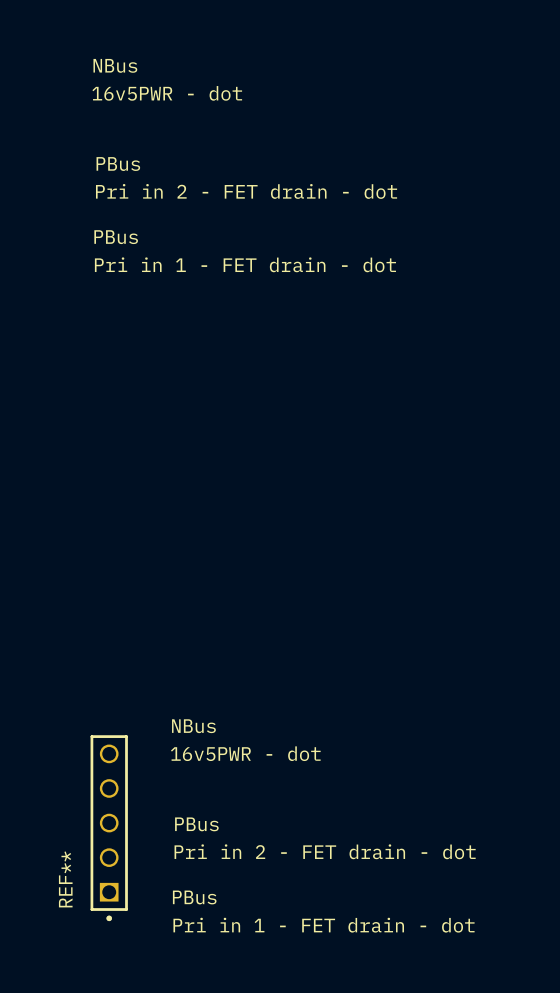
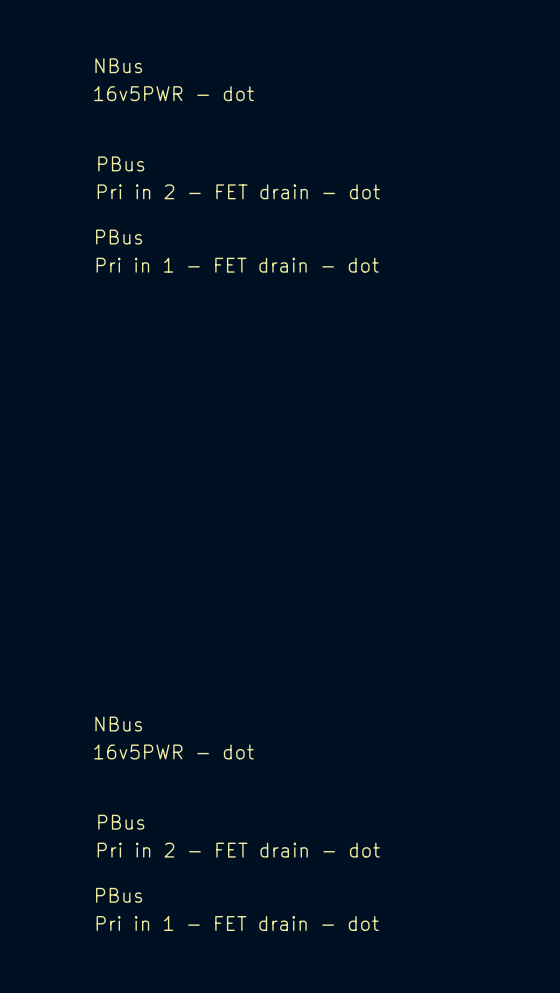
text position: NBus (193, 726) -> NBus (118, 724)
text position: 16v5PWR - dot (245, 753) -> 16v5PWR - dot (173, 751)
text: none -> PBus (121, 822)
text: PBus (196, 824) -> none
REF**: (109, 828) -> none
text position: Pri in 2 - FET drain - dot (325, 851) -> Pri in 2 - FET drain - dot (238, 850)
text: none -> PBus (119, 895)
text: PBus (194, 897) -> none
text position: Pri in 1 - FET drain - dot (324, 925) -> Pri in 1 - FET drain - dot (237, 923)

